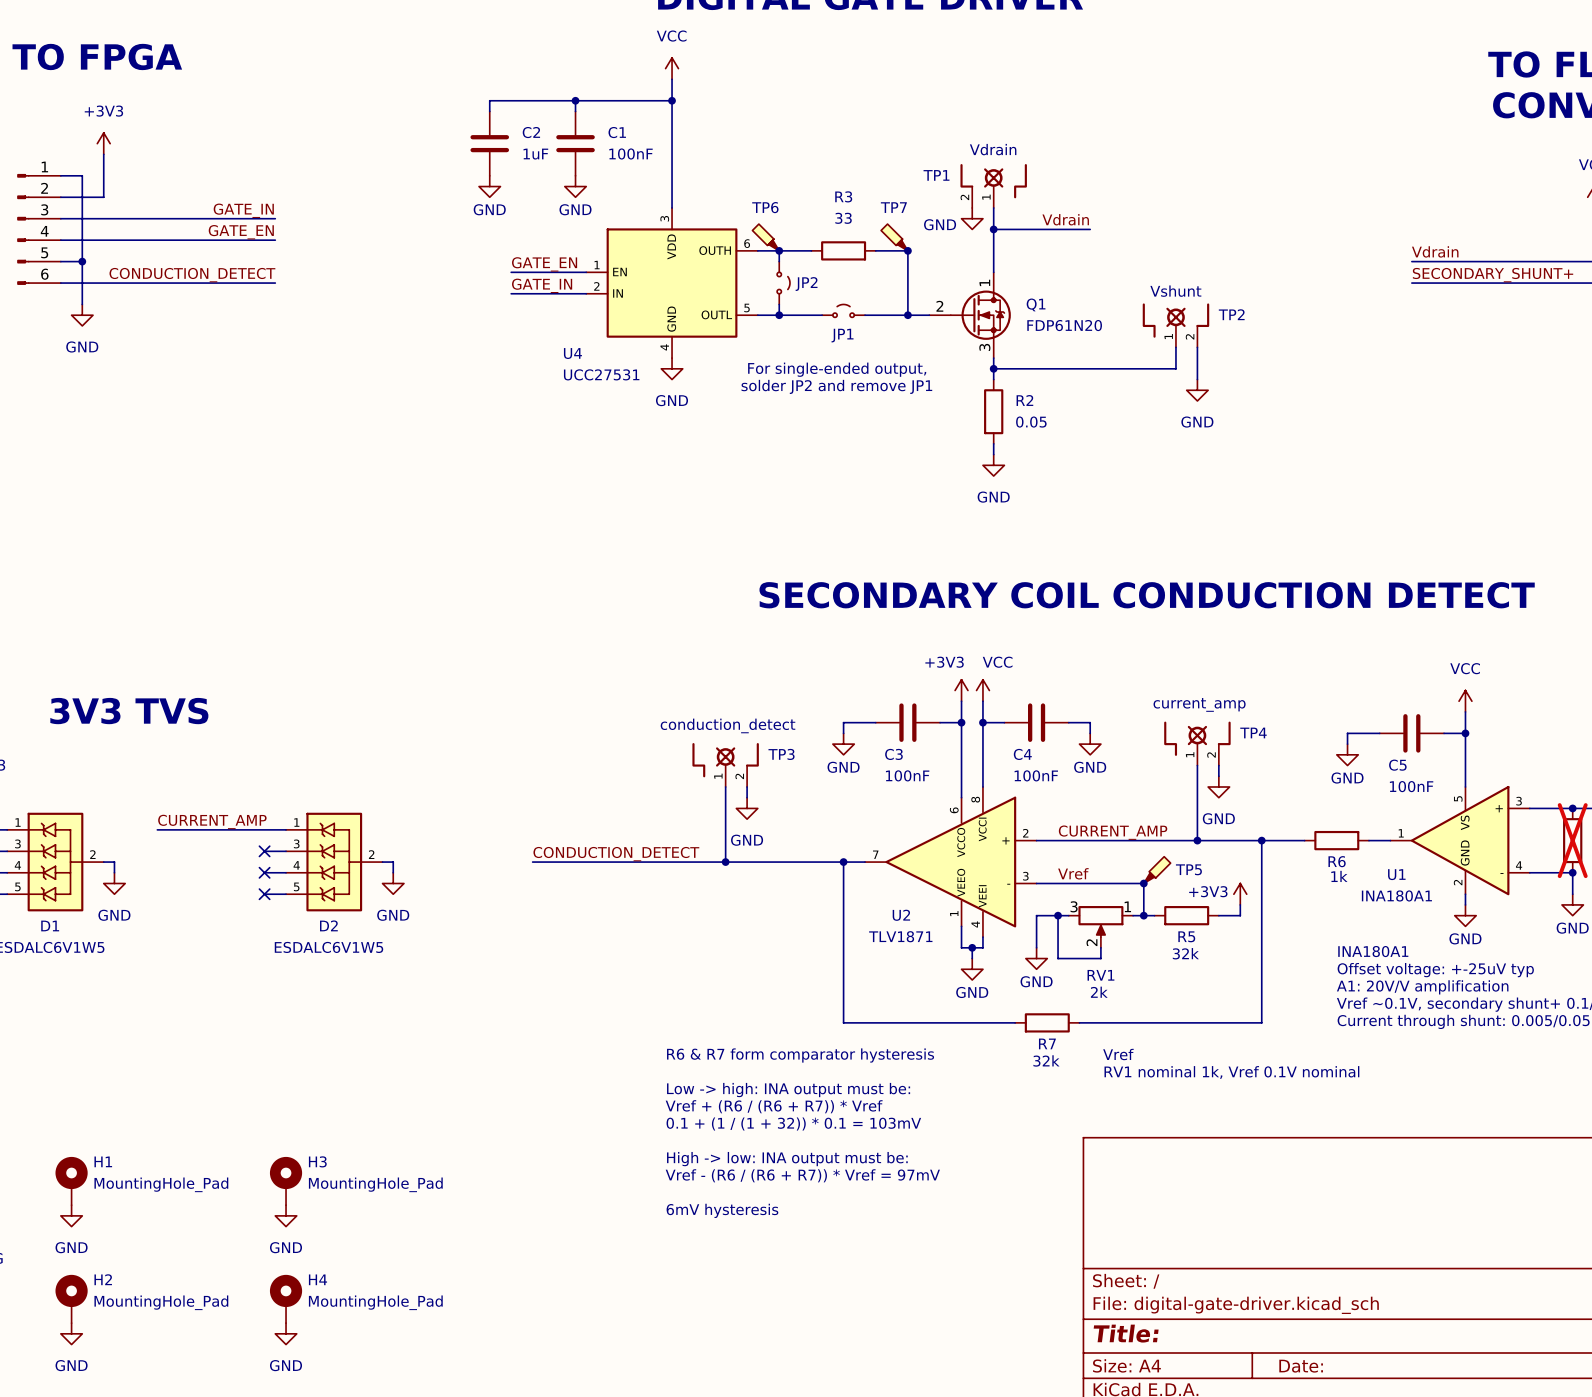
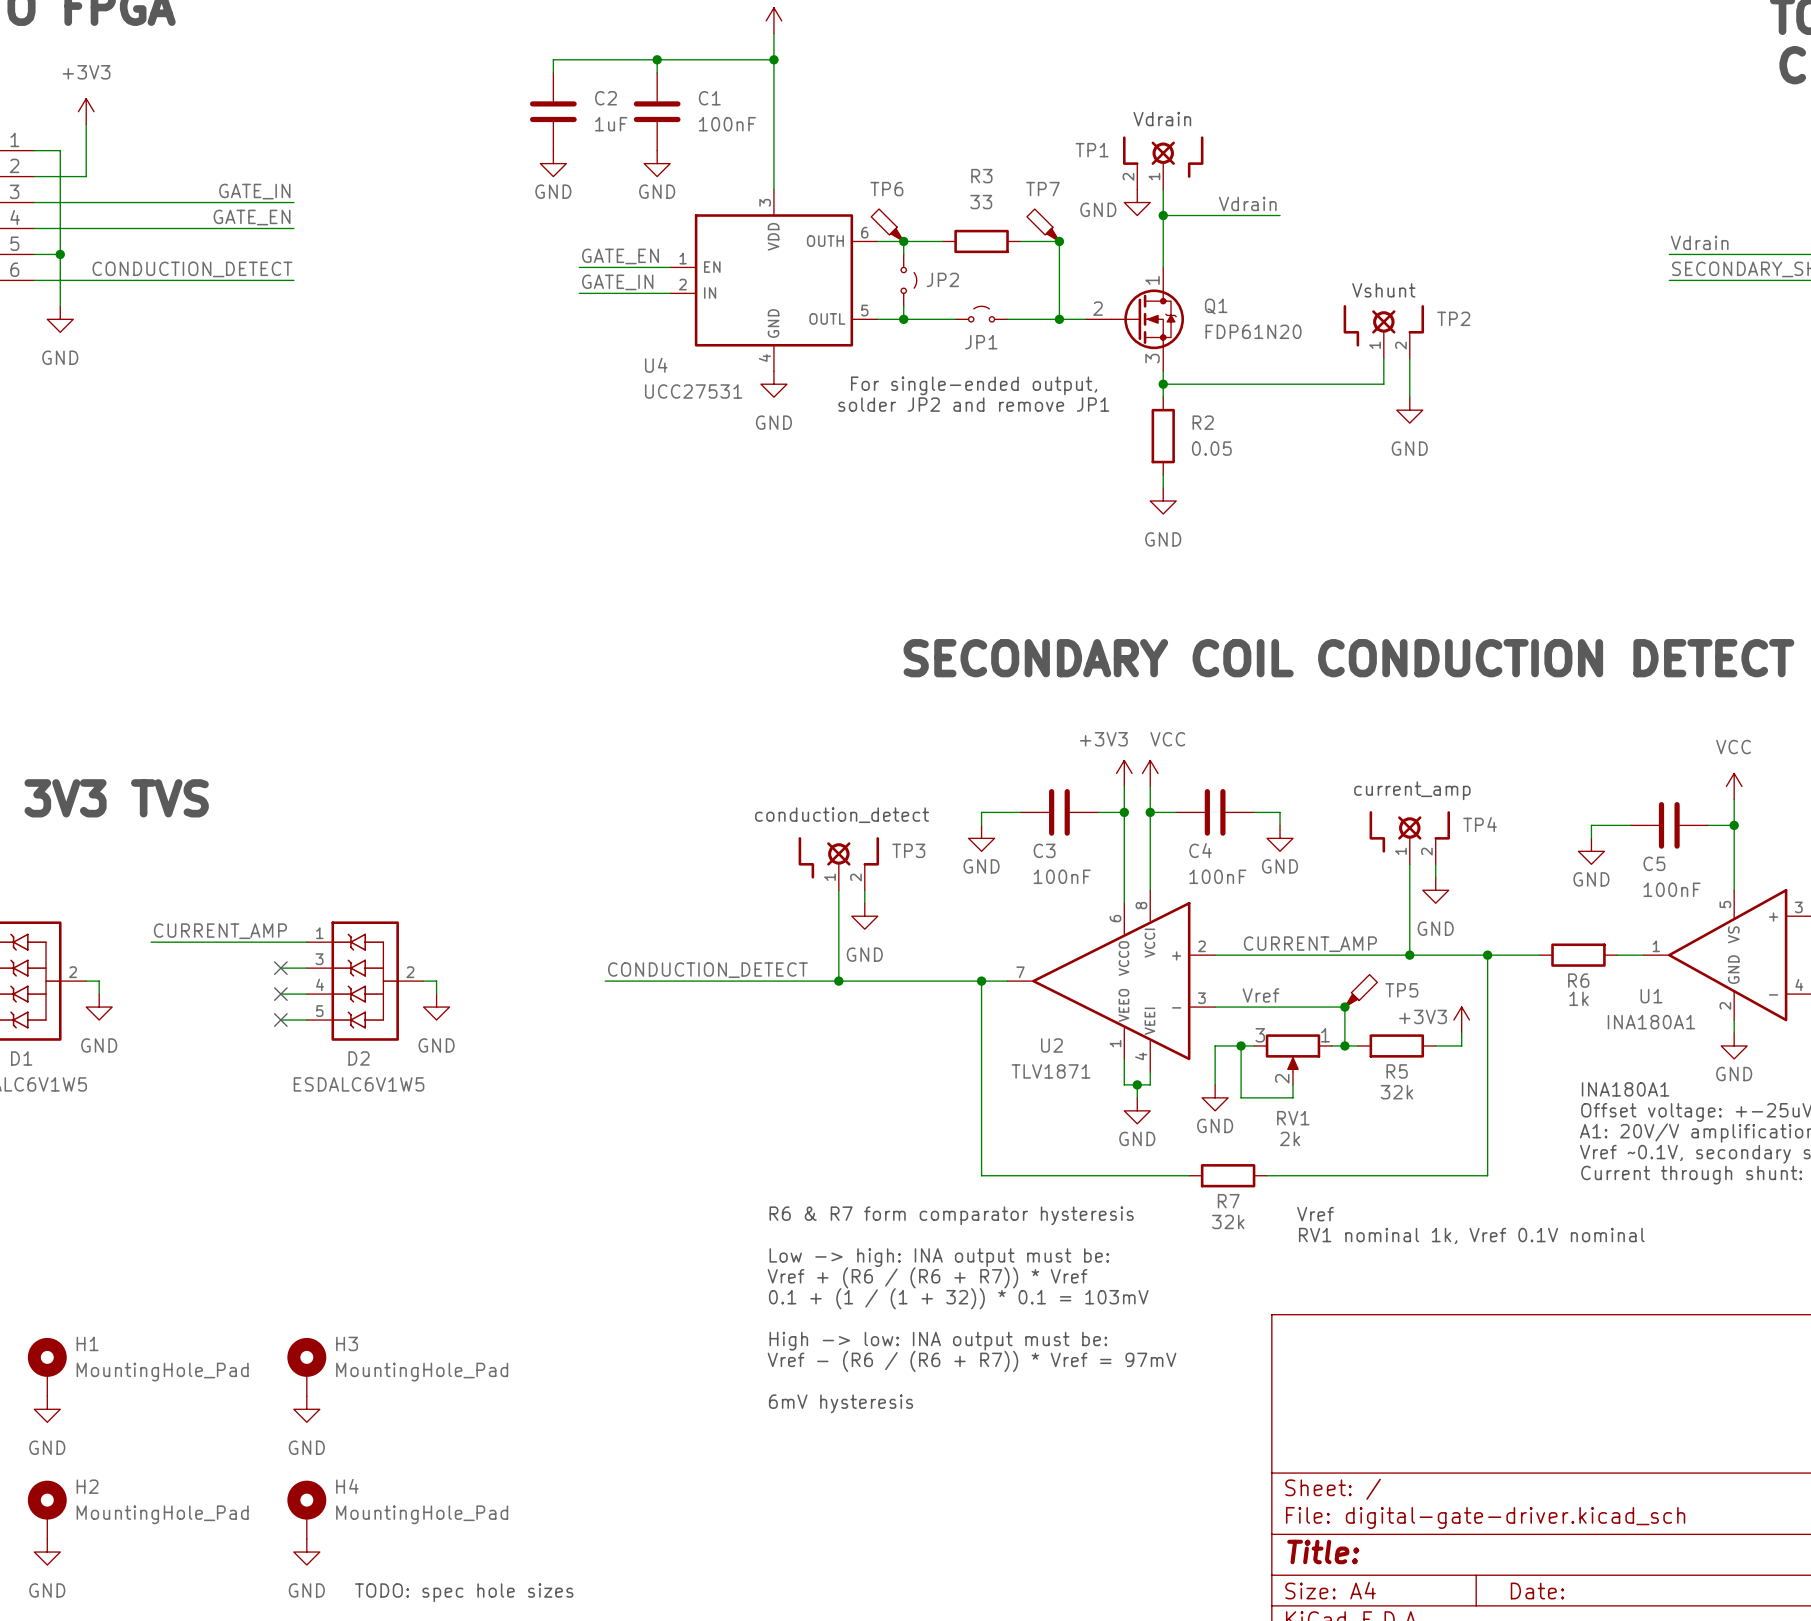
text: none -> TODO: spec hole sizes (464, 1592)

